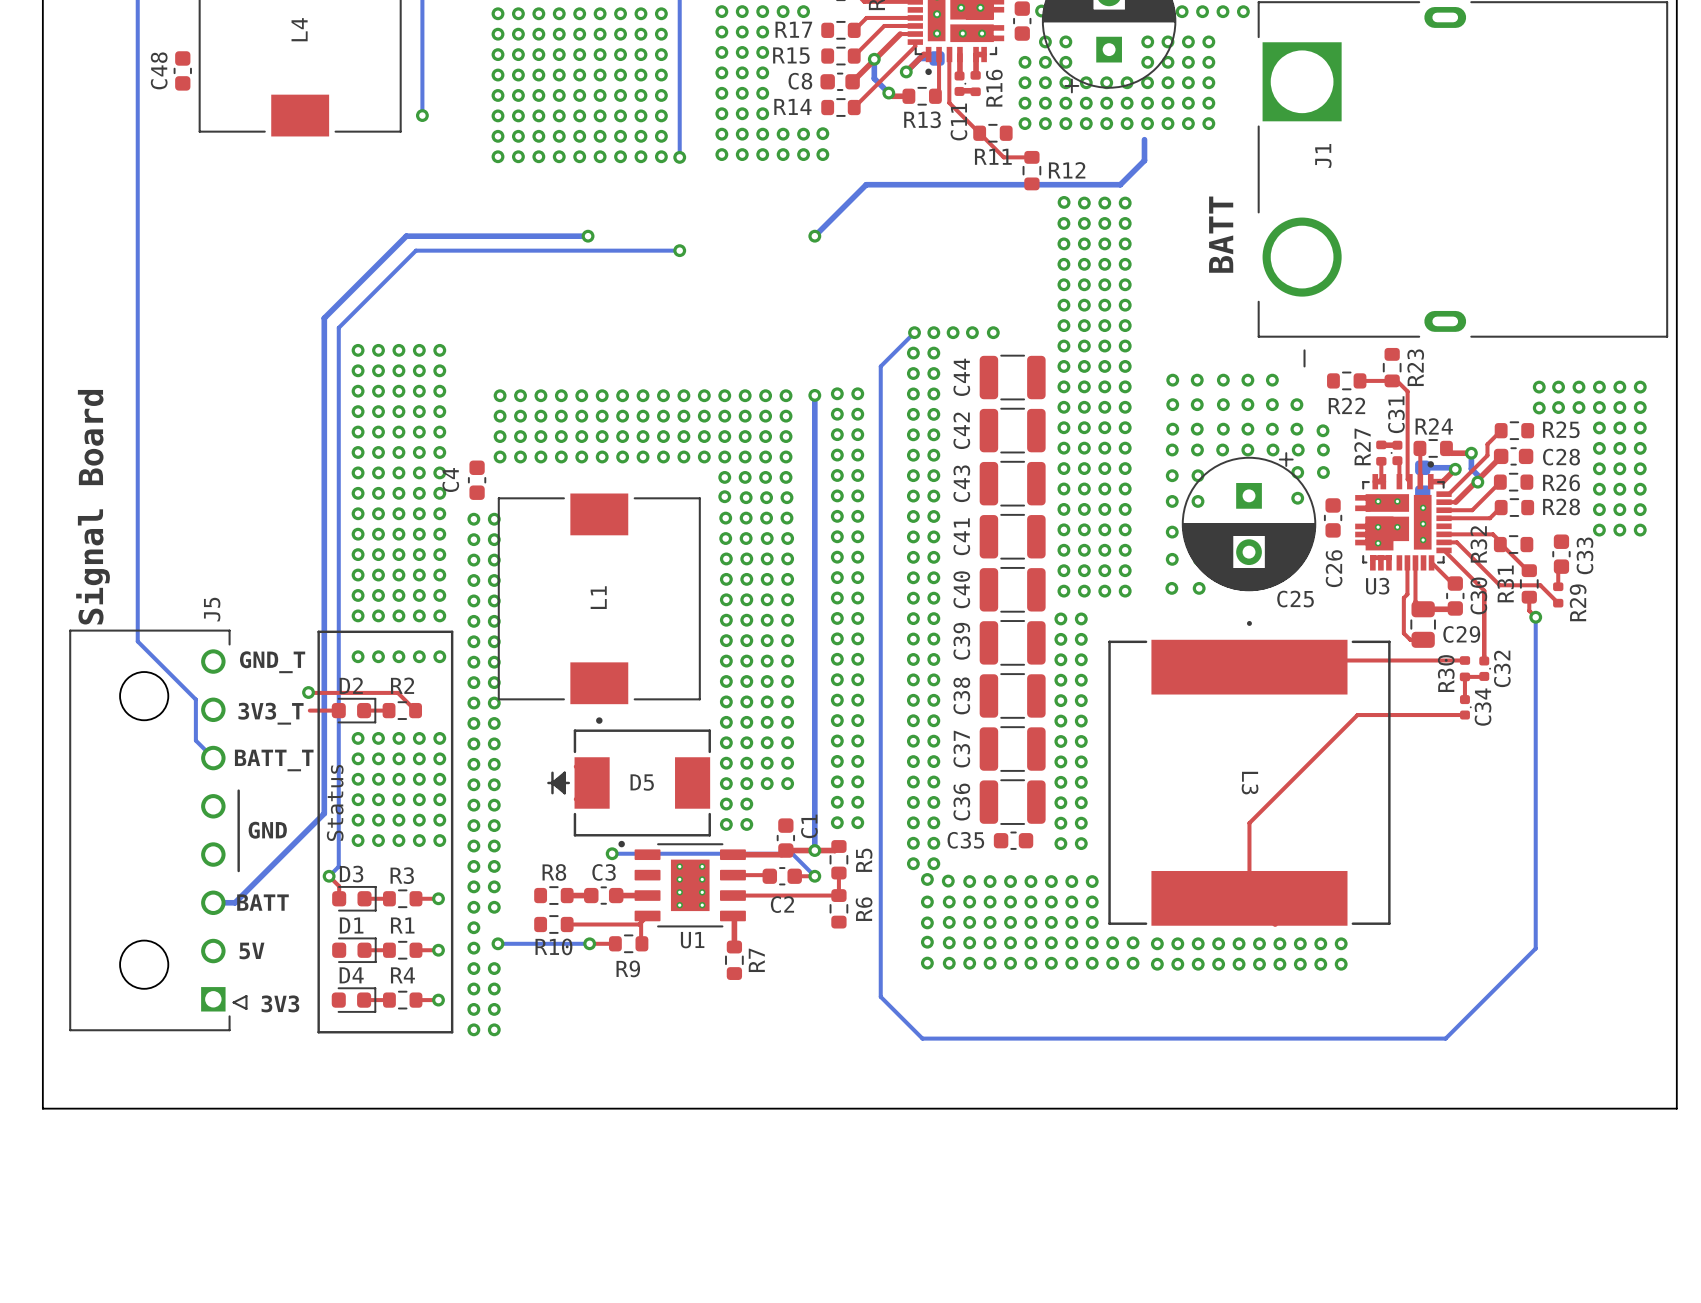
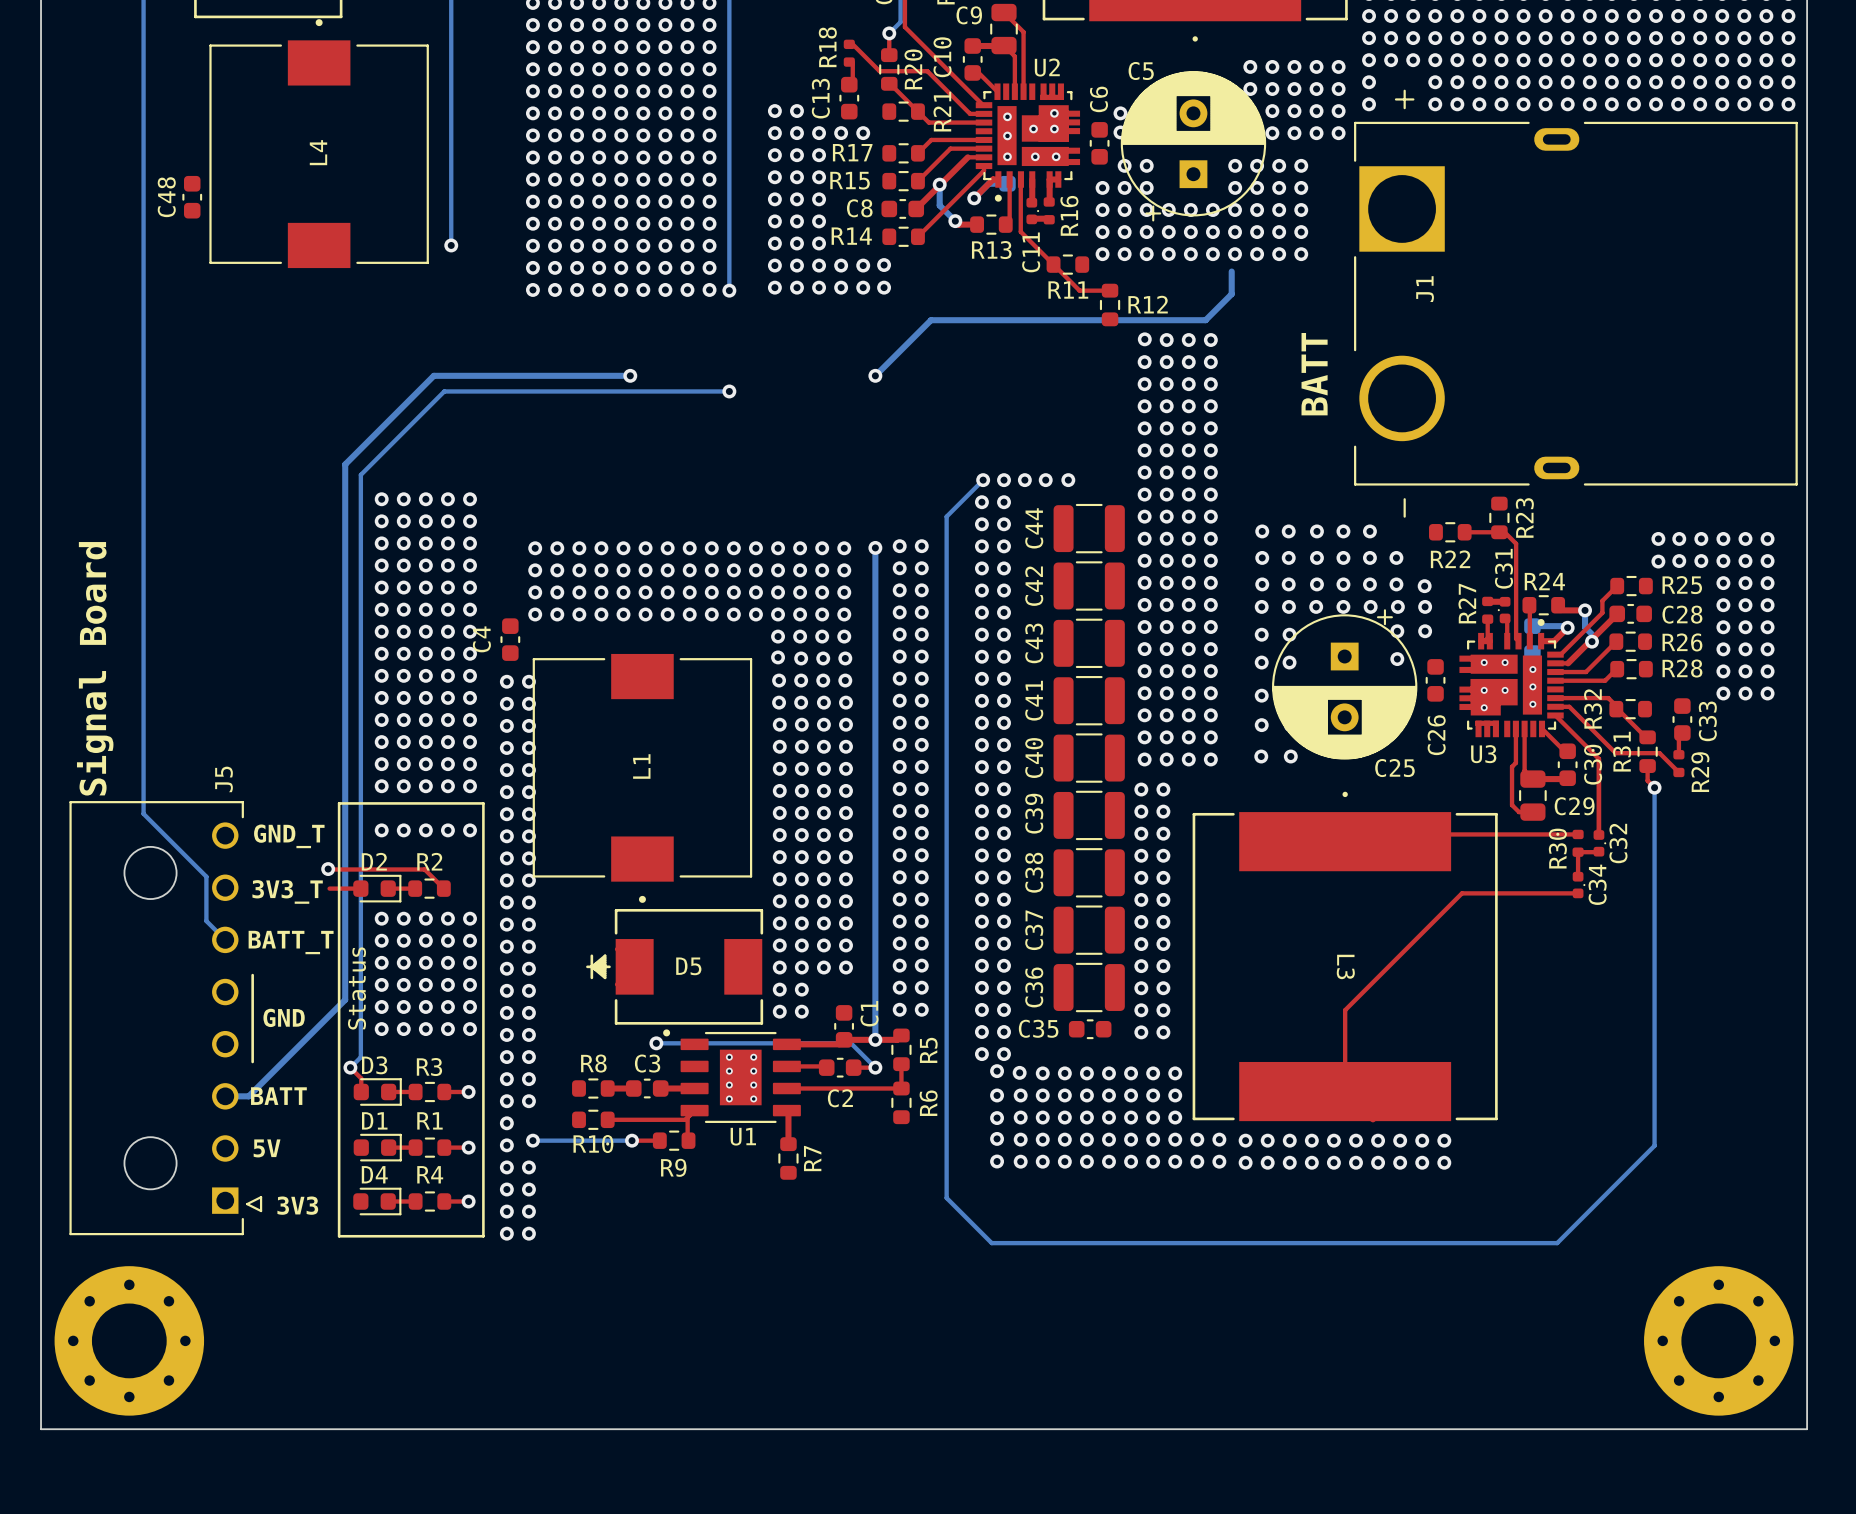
board edge: (42, 1108) (1676, 1108) -> (41, 1318) (41, 1429) (1807, 1429) (1807, 1318)
part: none -> (129, 1340)
part: none -> (1718, 1340)

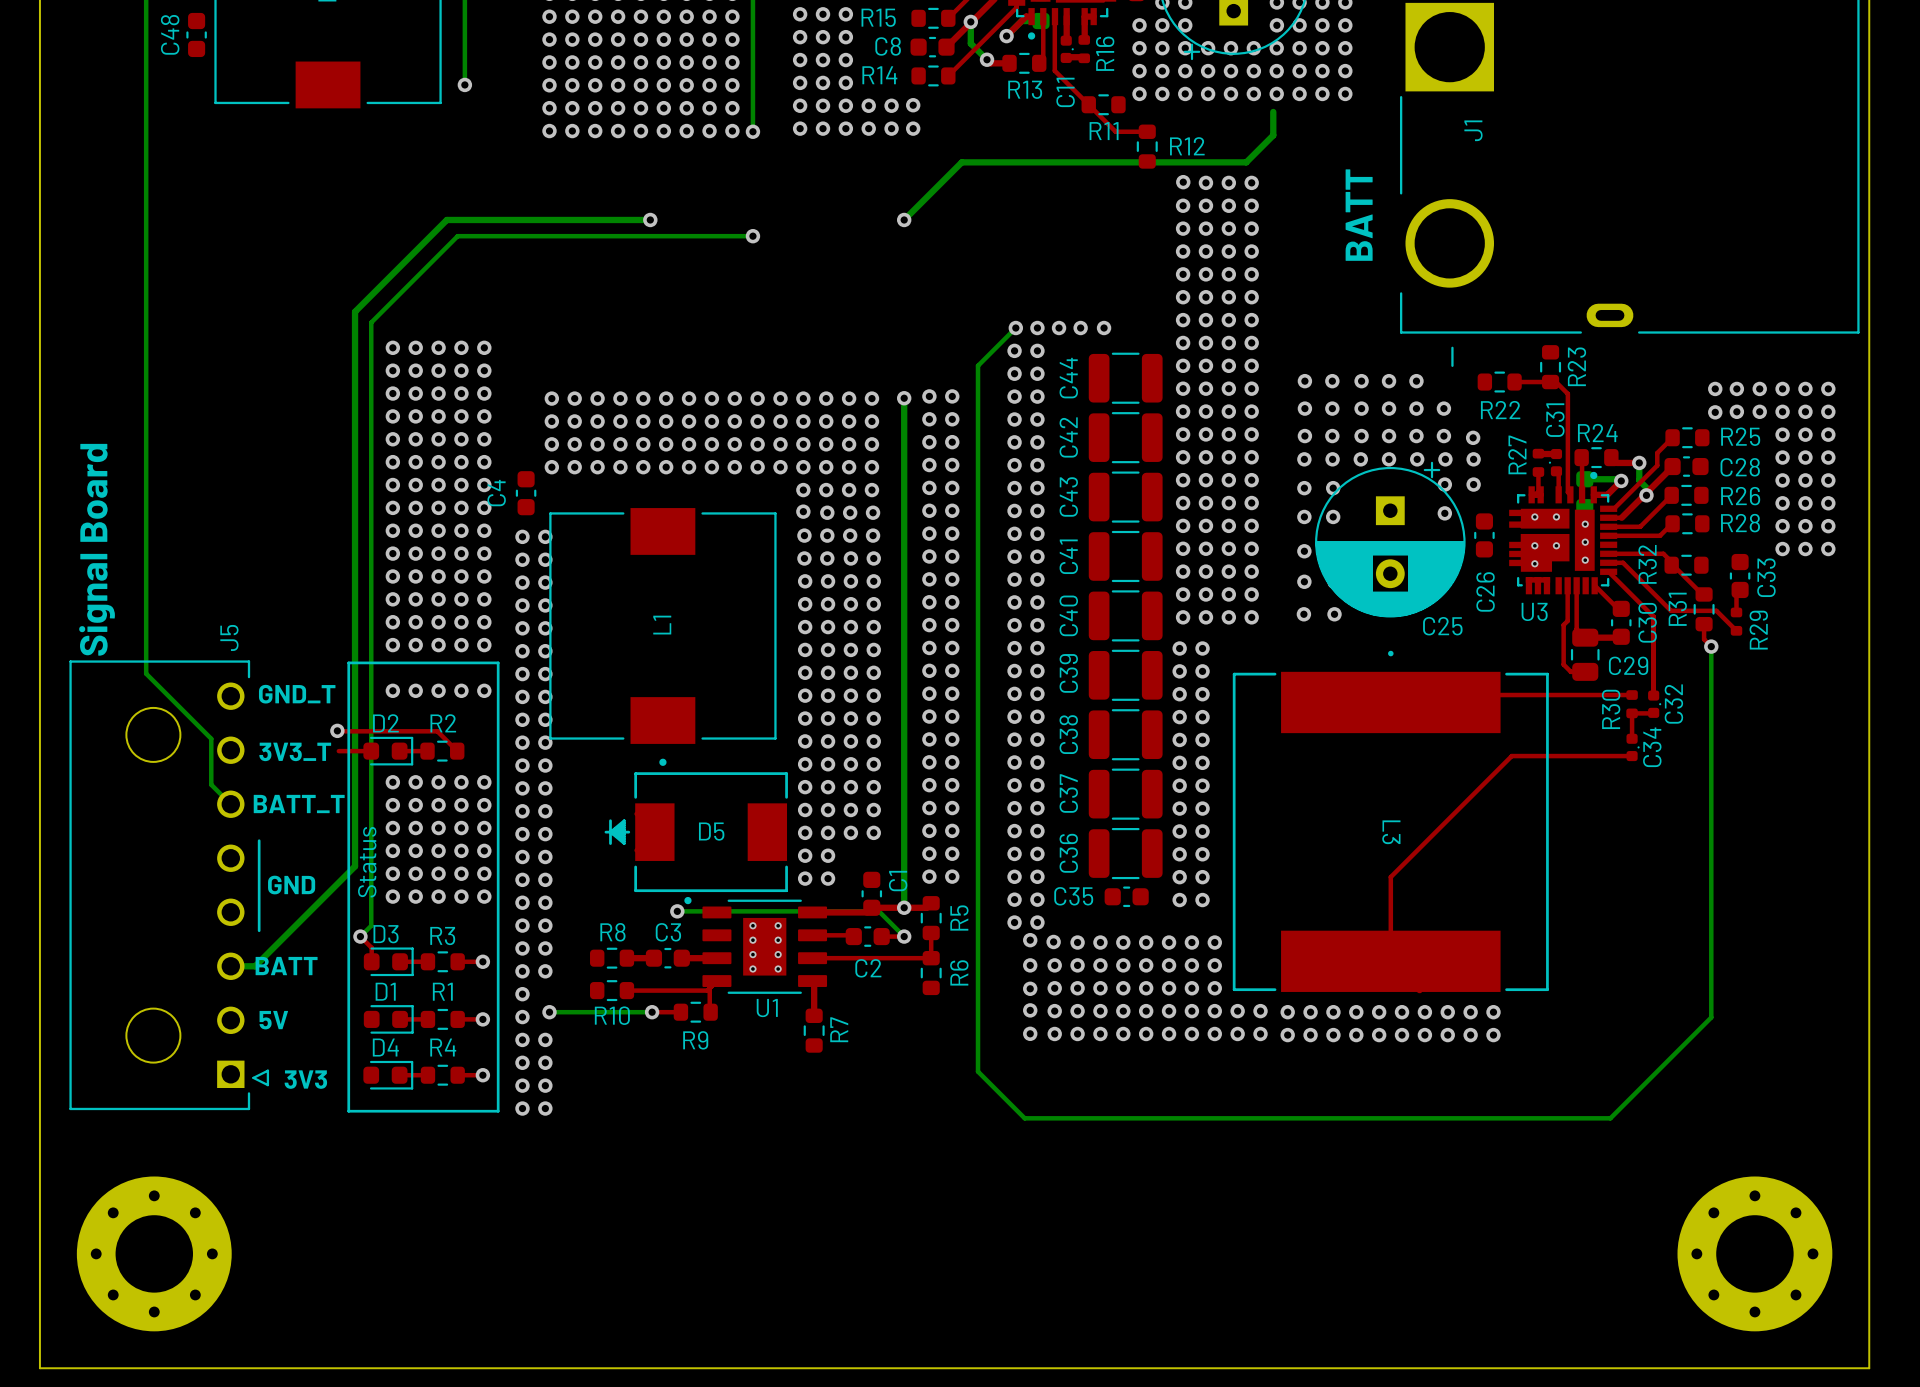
part position: (129, 1340) -> (154, 1253)
part position: (1718, 1340) -> (1754, 1253)
board edge: (41, 1429) (1807, 1429) -> (39, 1311) (39, 1368) (1869, 1368) (1869, 1311)

